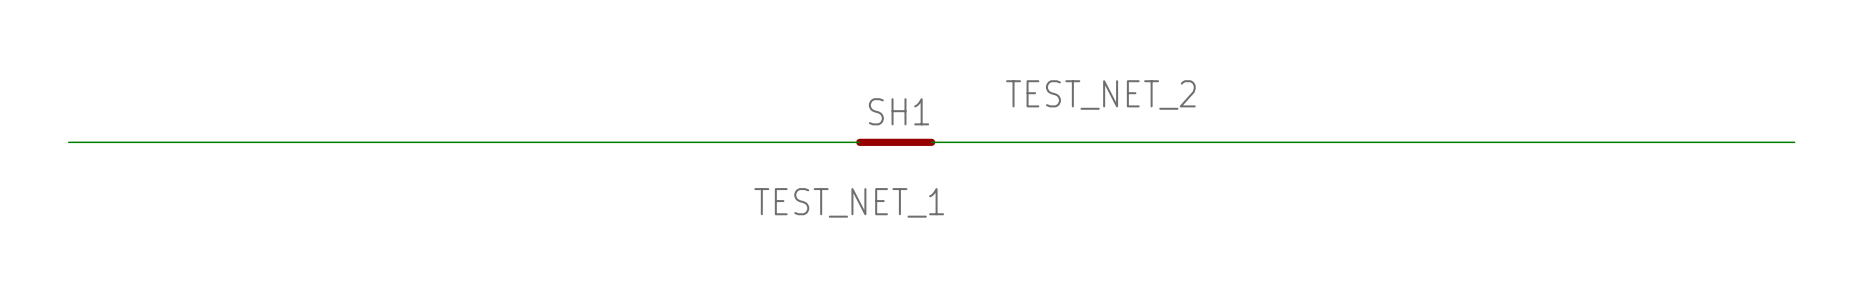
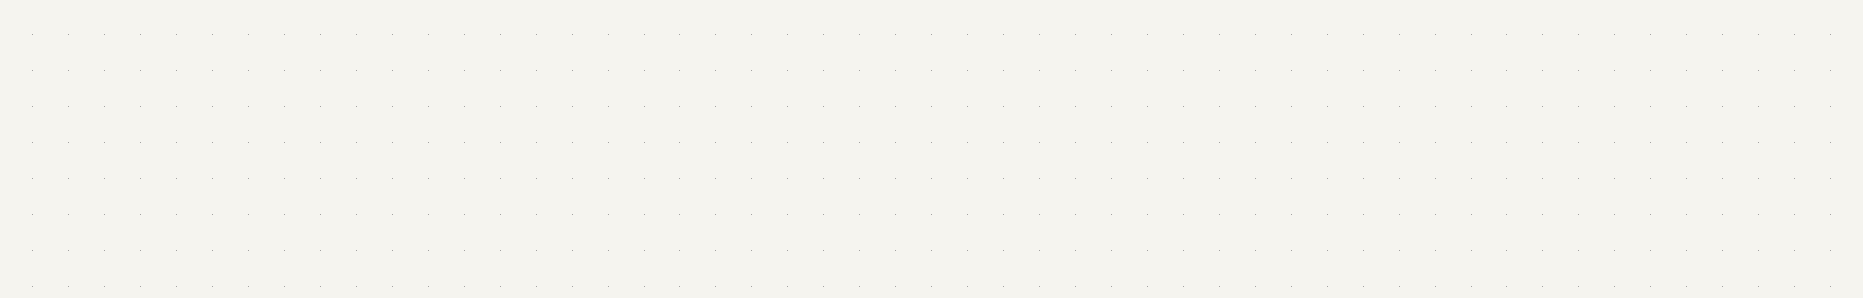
label: TEST_NET_2 (1100, 95) -> none
wire: (68, 142) (859, 142) -> none
SH1: (895, 142) -> none
wire: (931, 142) (1794, 142) -> none
label: TEST_NET_1 (849, 202) -> none

